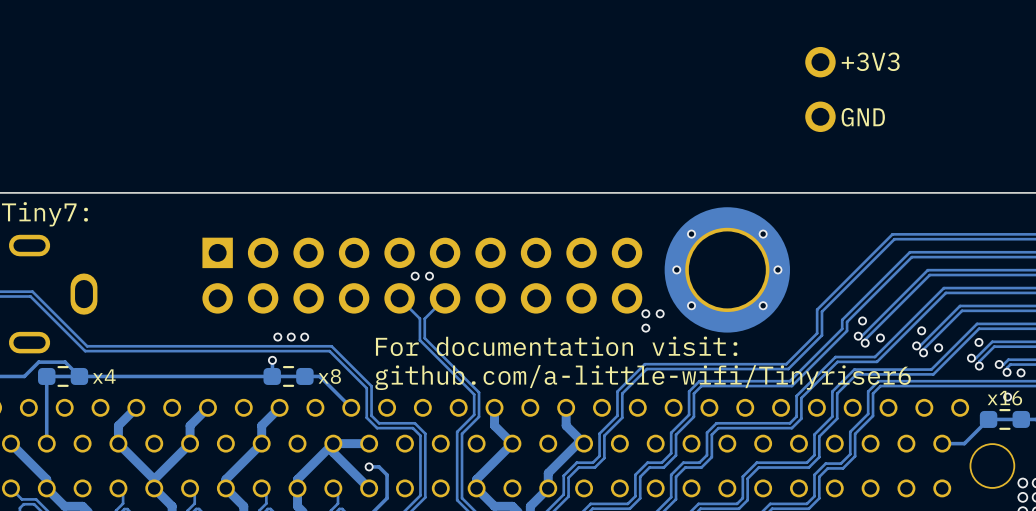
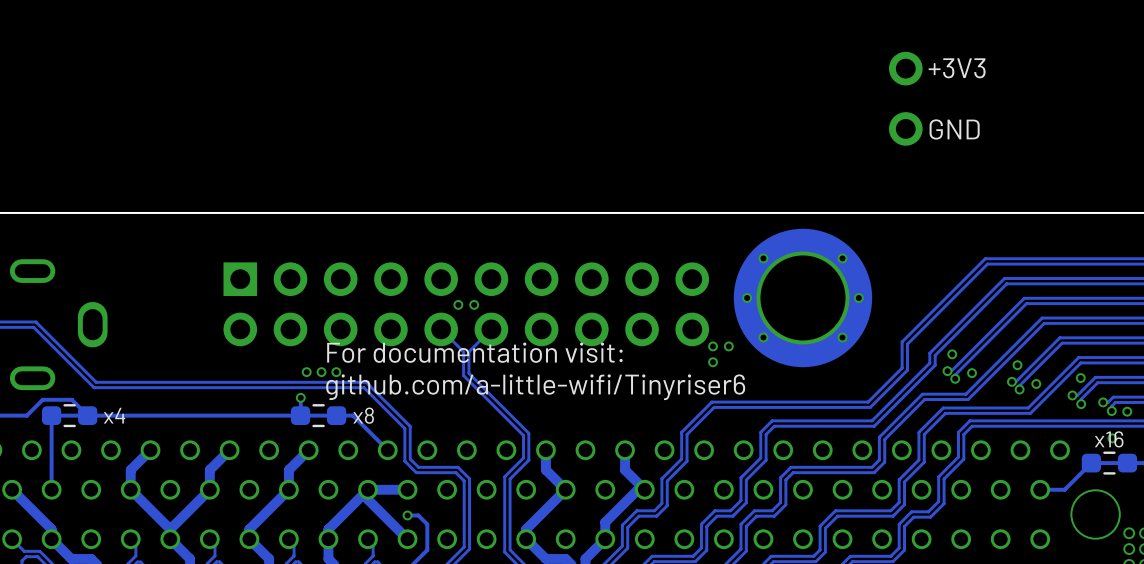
text position: For documentation visit: (556, 346) -> For documentation visit: (474, 352)
text position: github.com/a-little-wifi/Tinyriser6 (643, 377) -> github.com/a-little-wifi/Tinyriser6 (535, 387)

